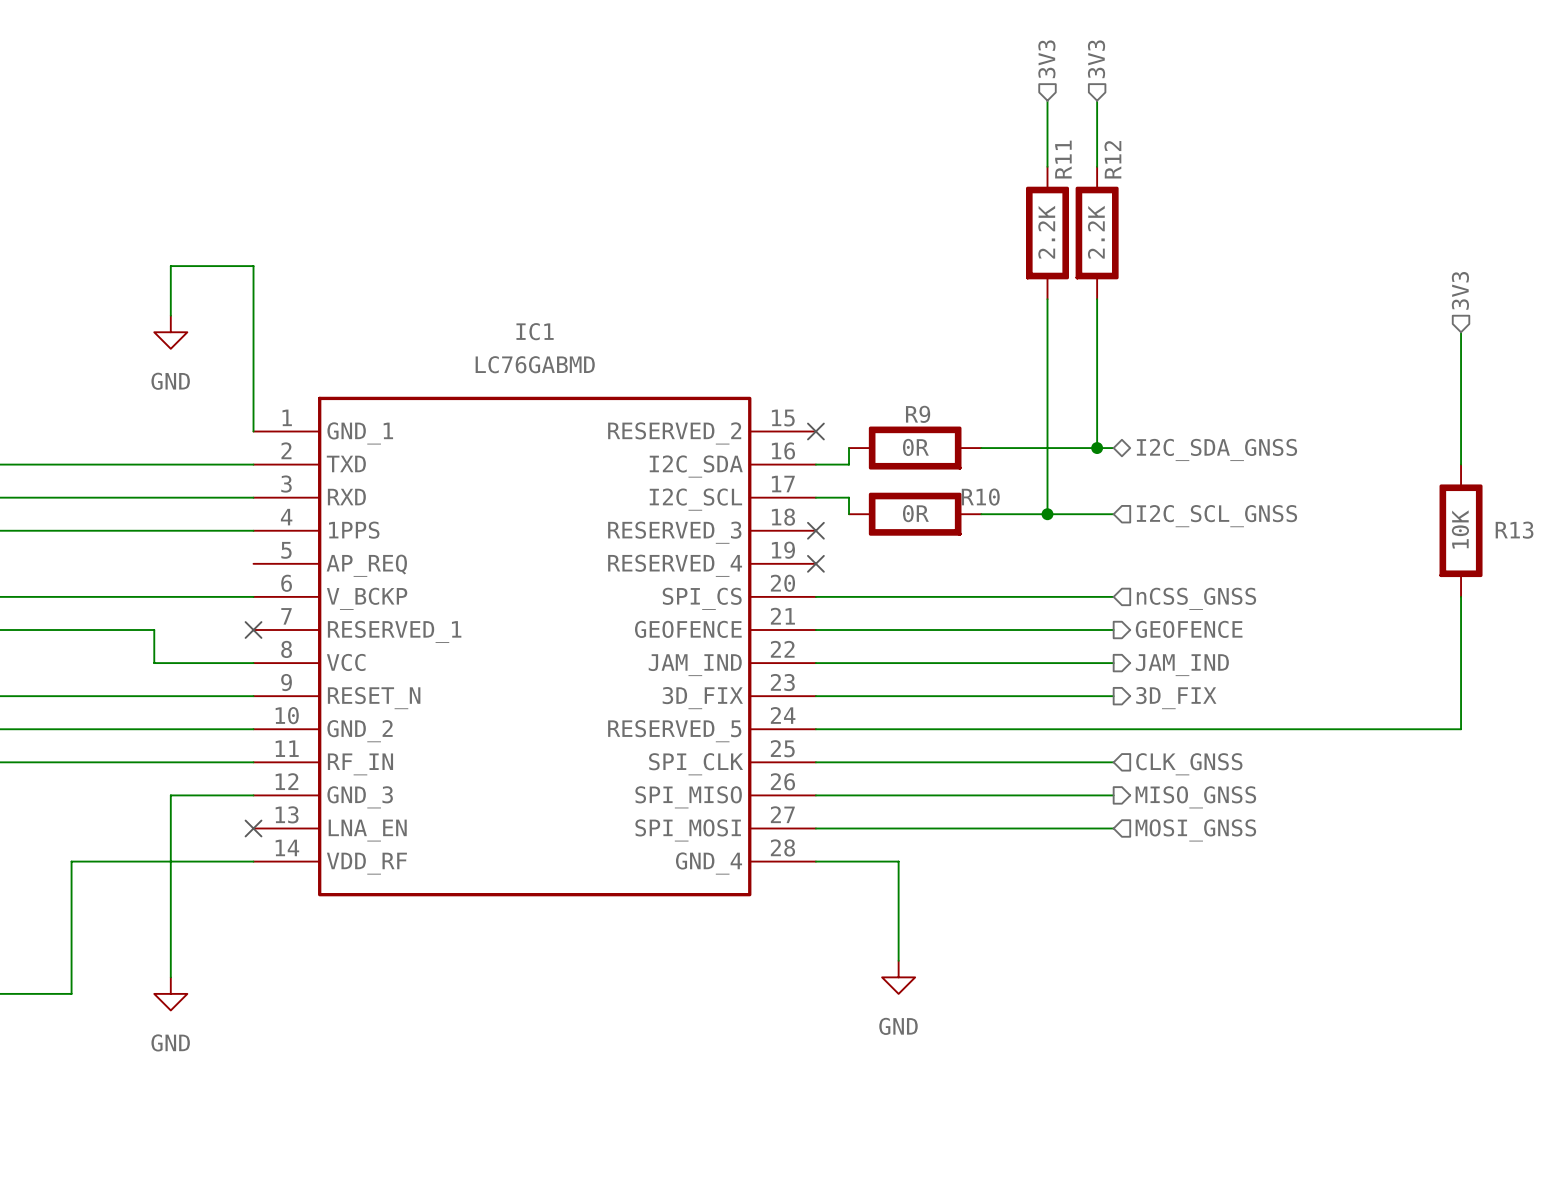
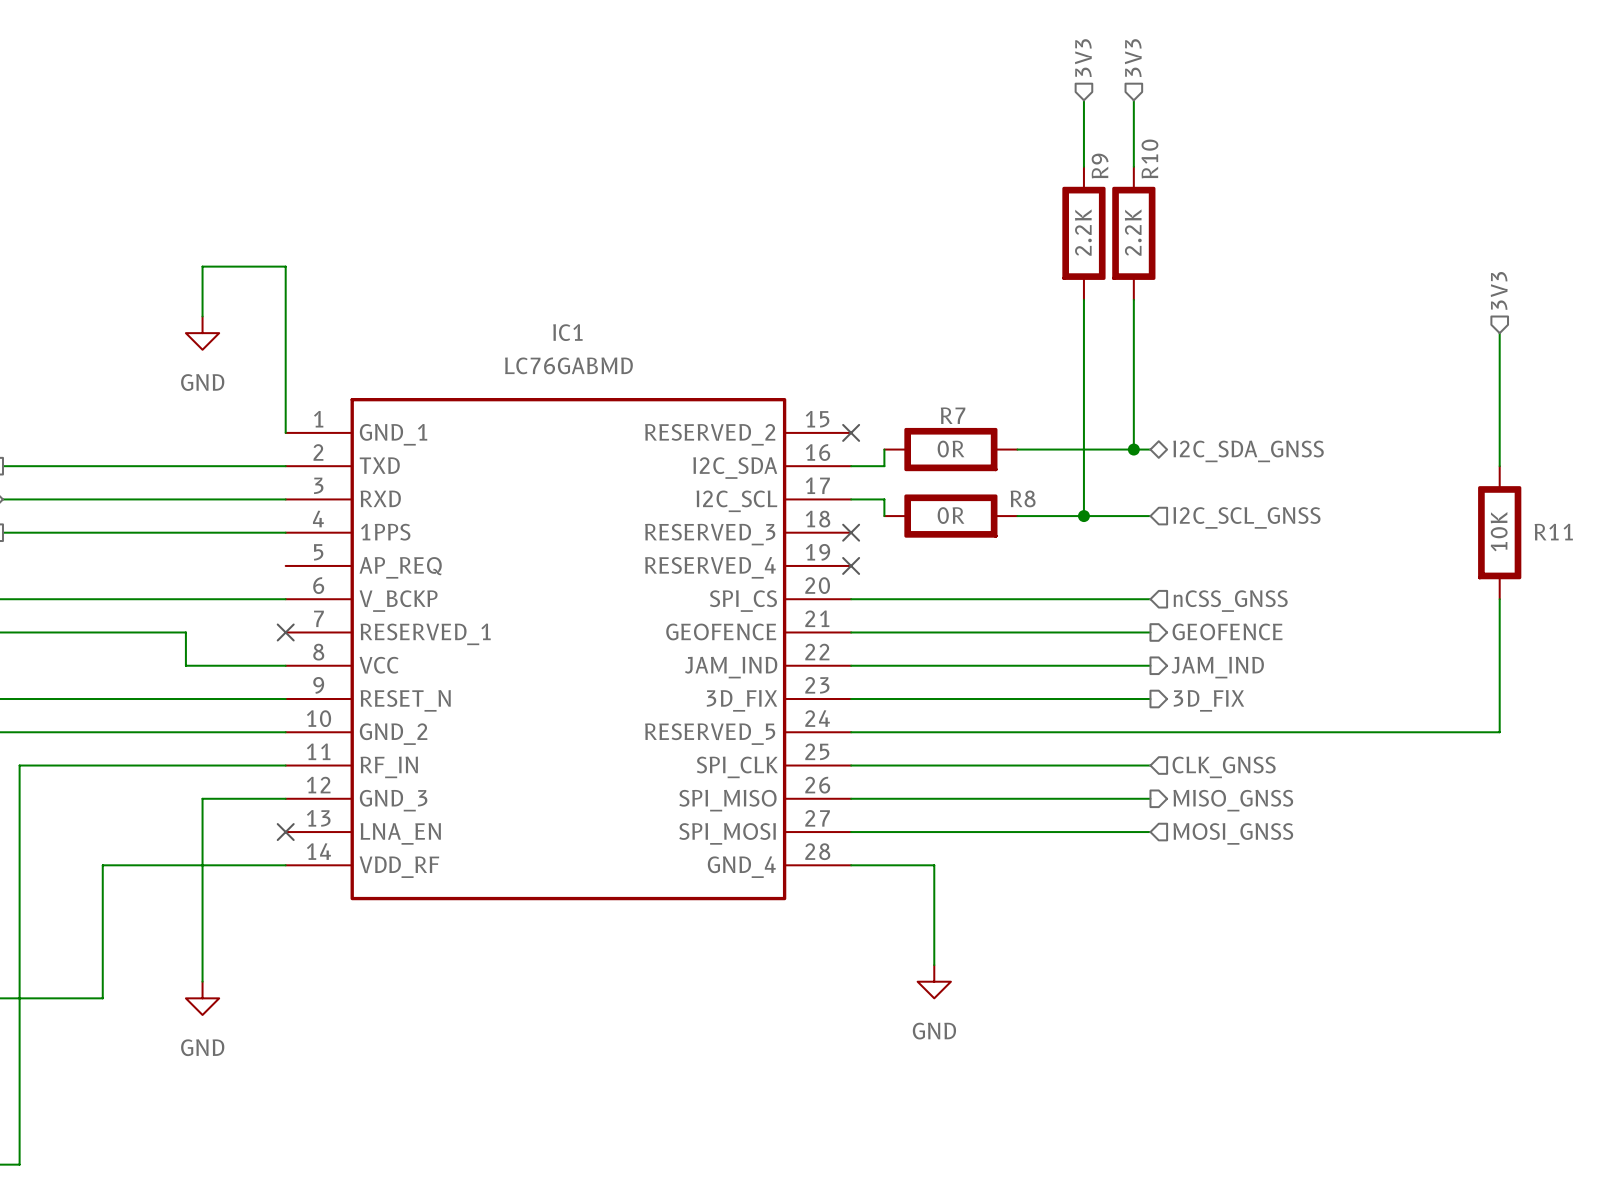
R11 name: R11 (1063, 159) -> R9 (1100, 166)
R12 name: R12 (1112, 159) -> R10 (1149, 159)
R9 name: R9 (918, 414) -> R7 (953, 415)
R10 name: R10 (980, 497) -> R8 (1023, 498)
R13 name: R13 (1514, 530) -> R11 (1553, 532)

